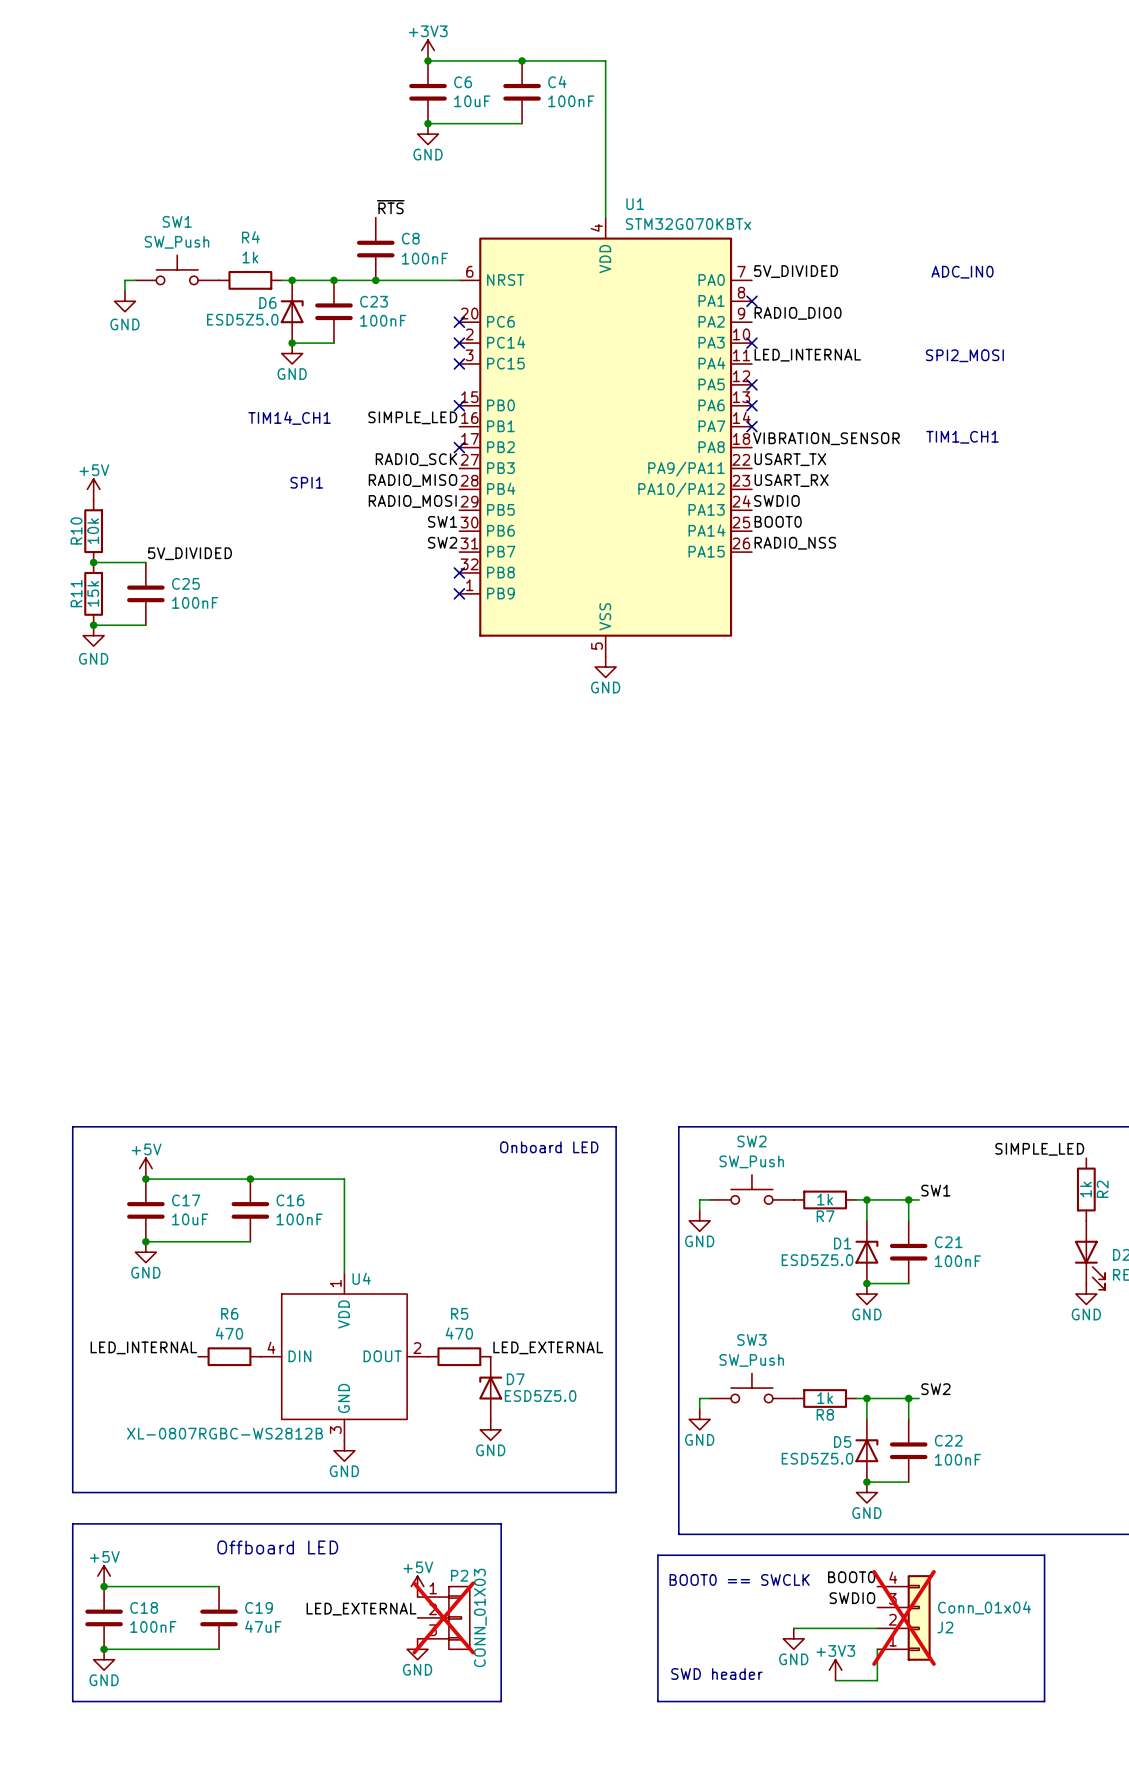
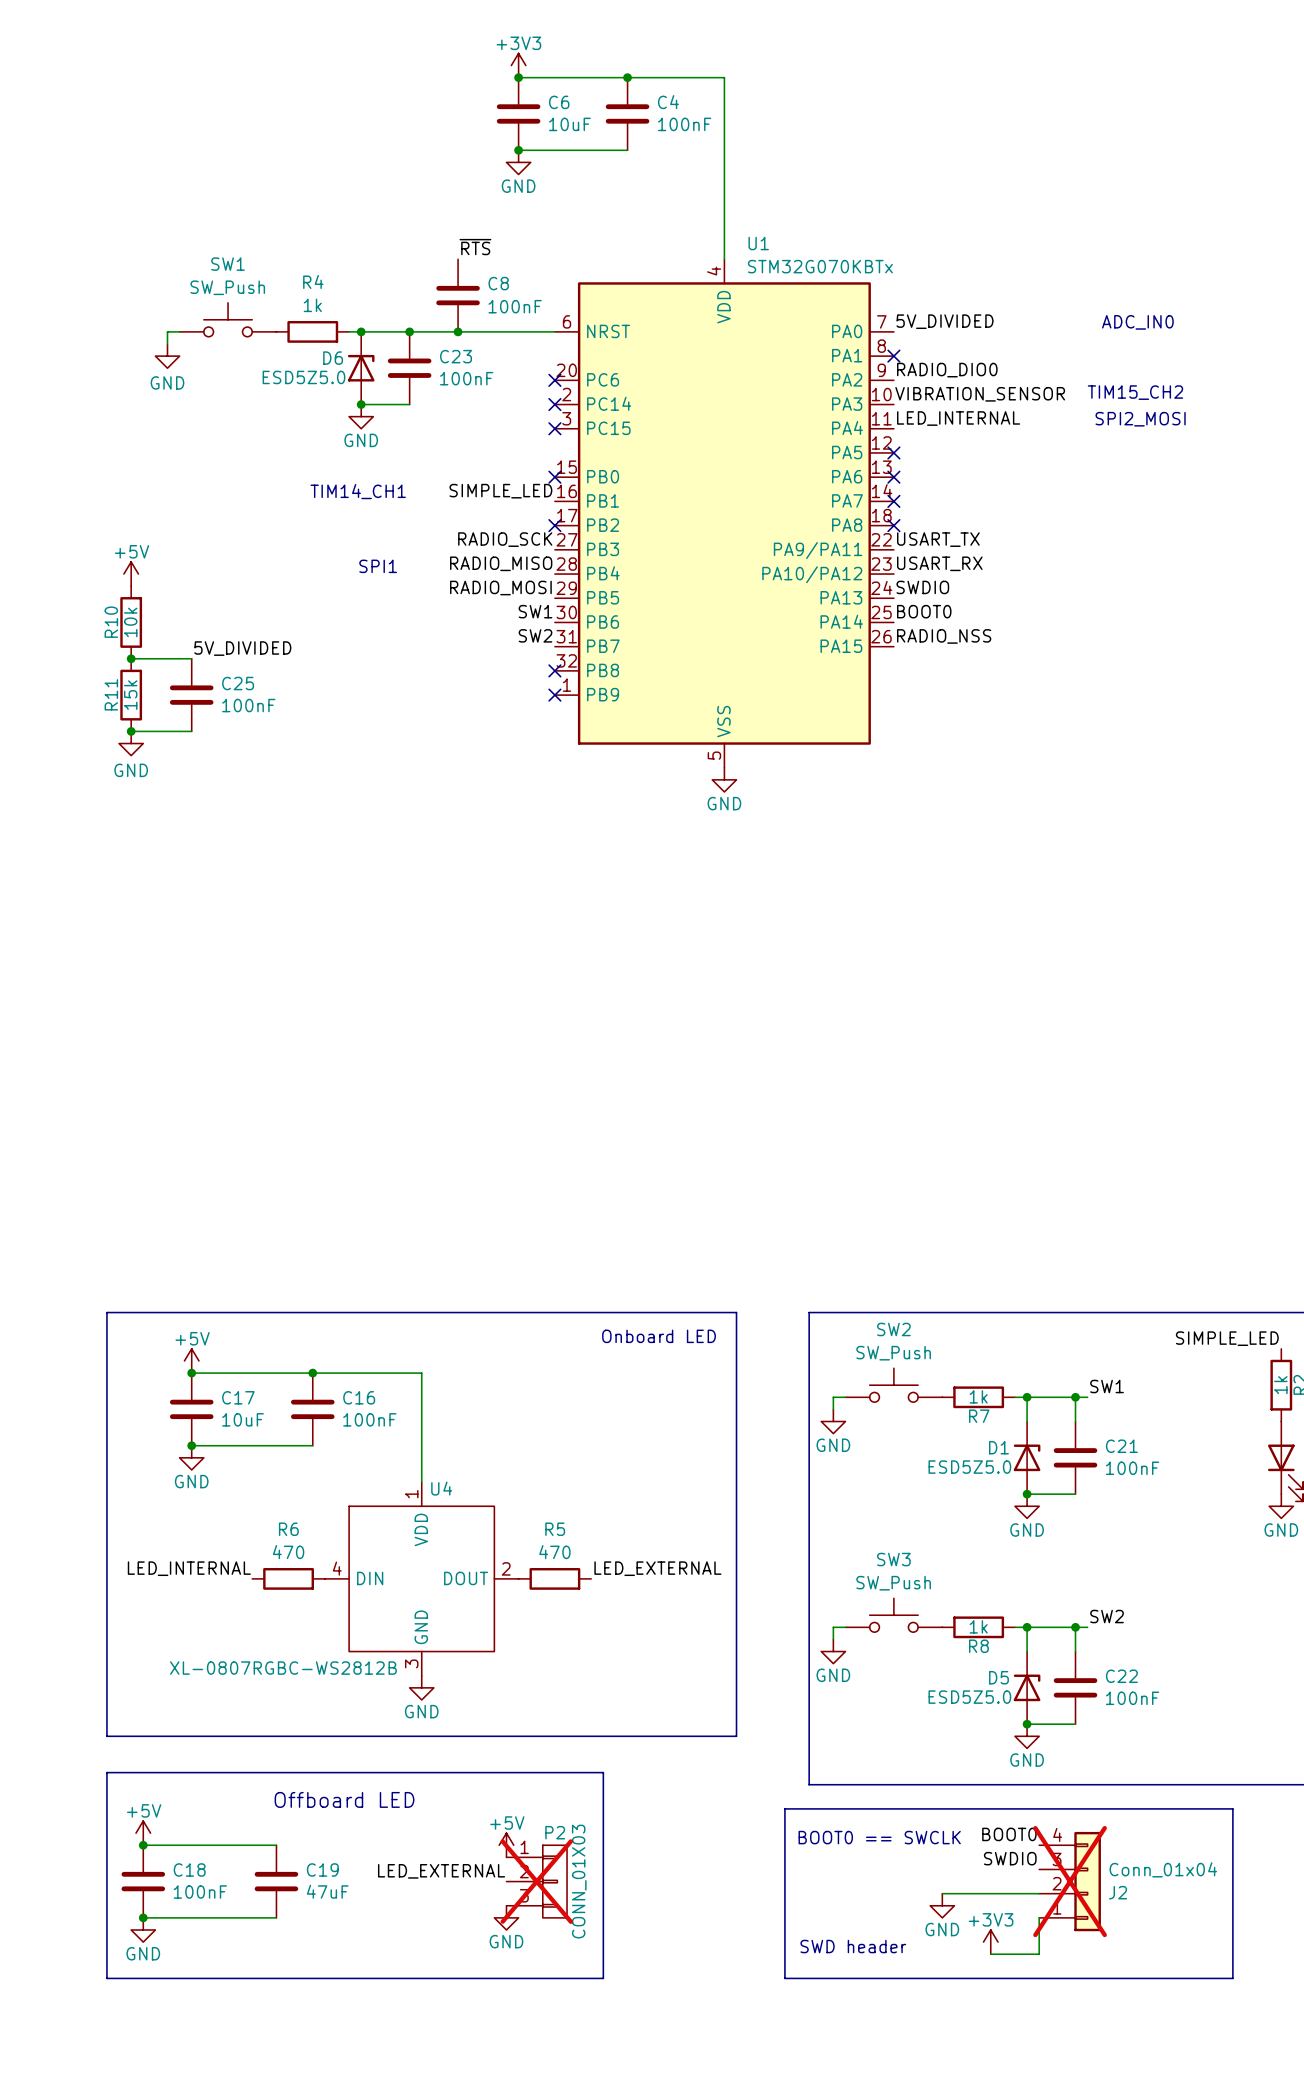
text: none -> TIM15_CH2 (1135, 392)
no-connect mark: (751, 343) -> none
text: TIM1_CH1 (962, 437) -> none
label position: VIBRATION_SENSOR (826, 438) -> VIBRATION_SENSOR (980, 394)
no-connect mark: none -> (893, 525)
D7: ESD5Z5.0 (490, 1388) -> none
power symbol: GND (490, 1429) -> none

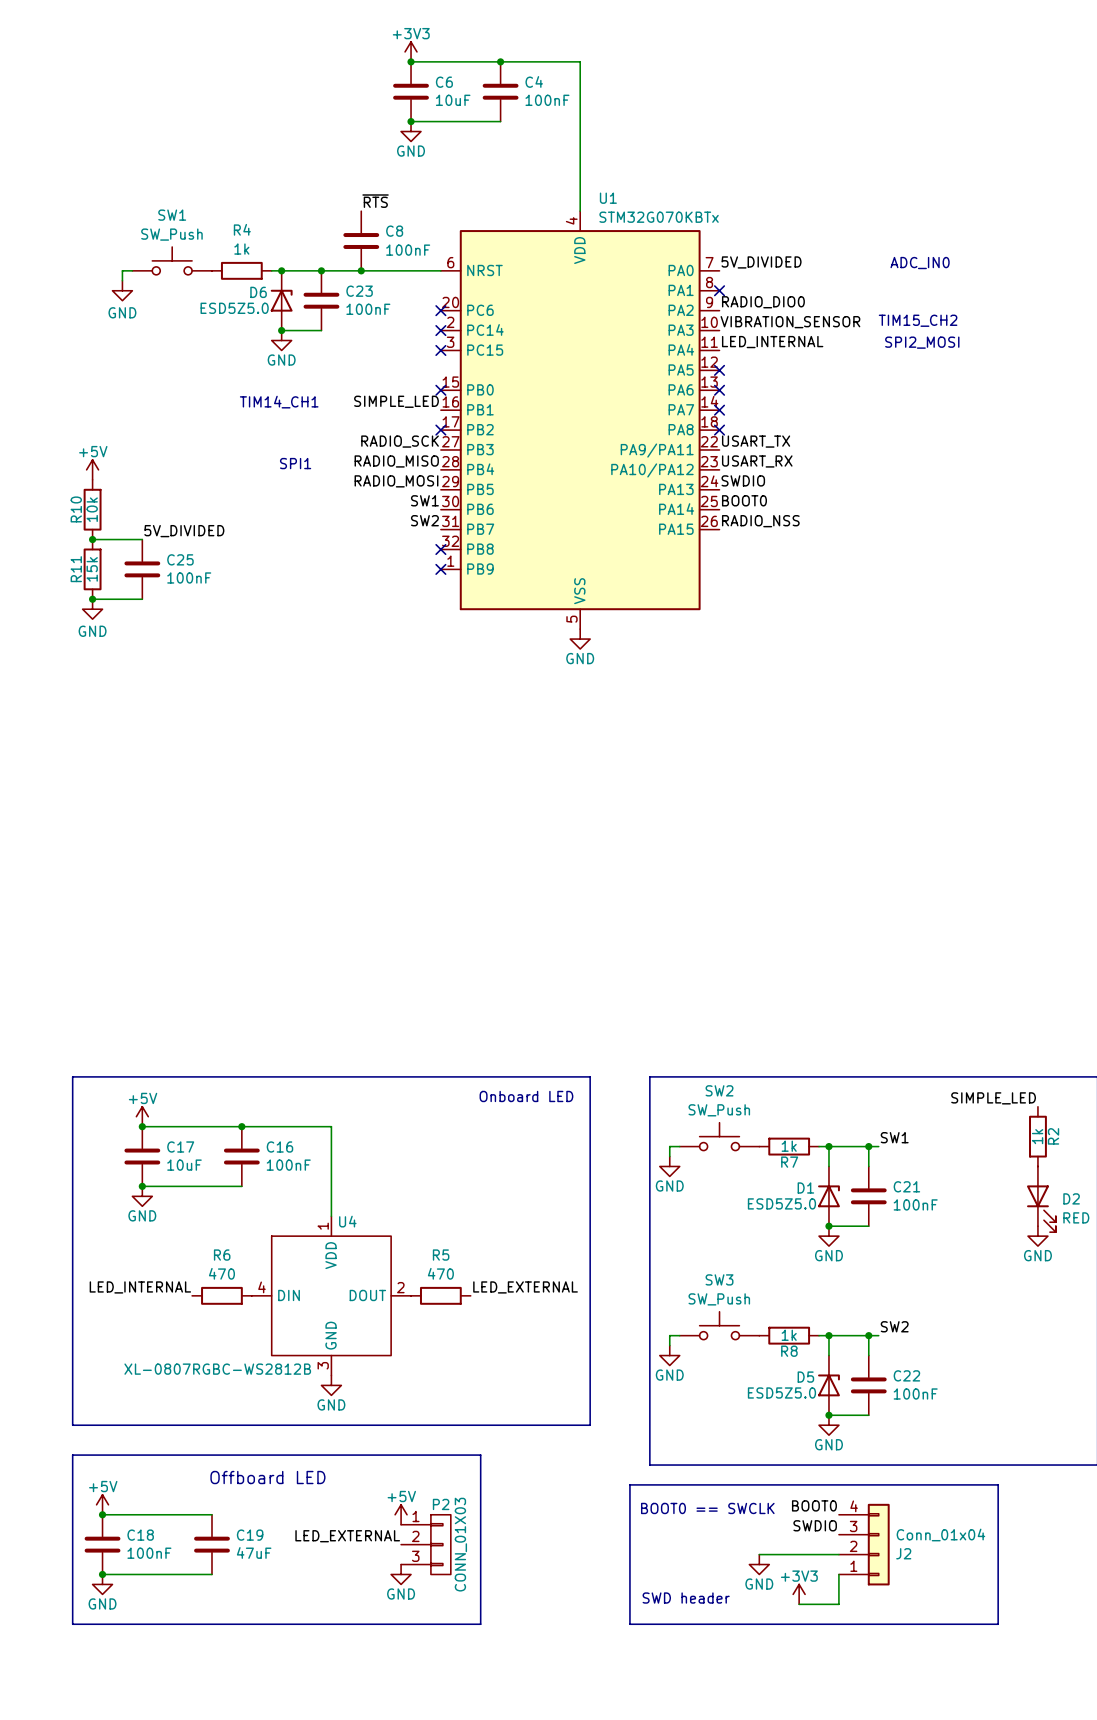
P2 do-not-place cross: (536, 1881) -> none
J2 do-not-place cross: (1070, 1881) -> none

